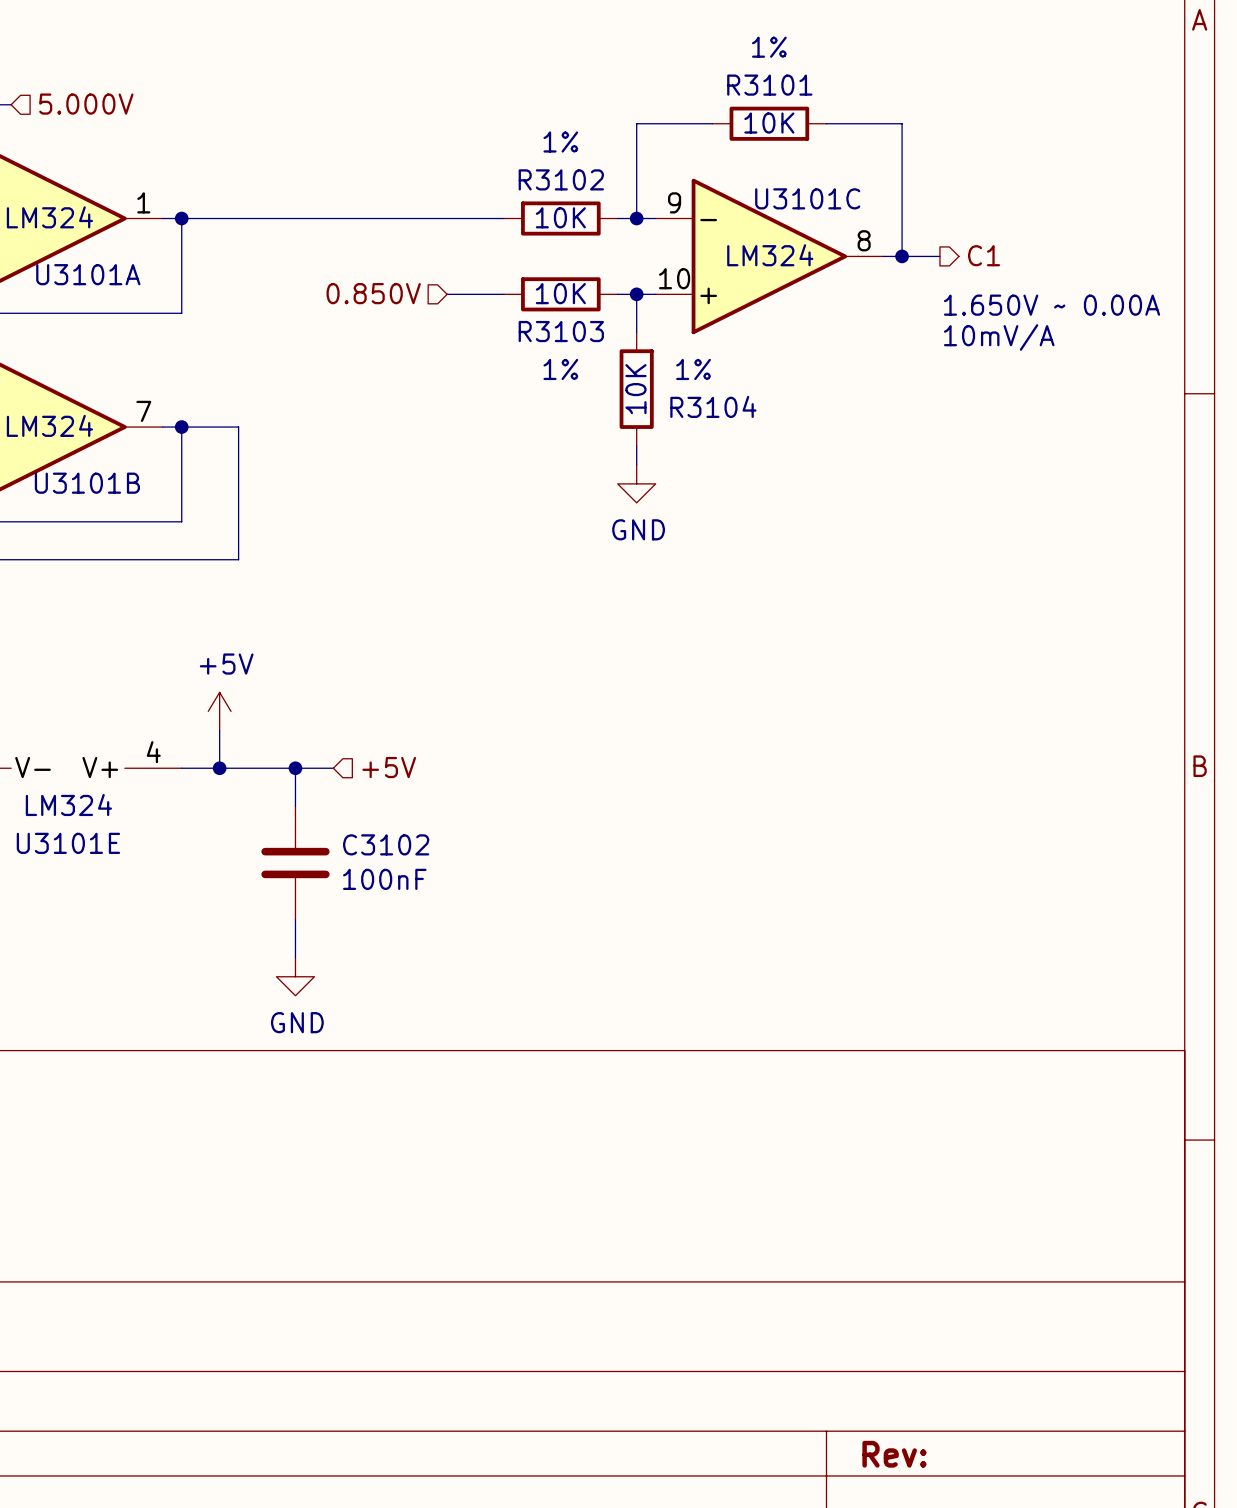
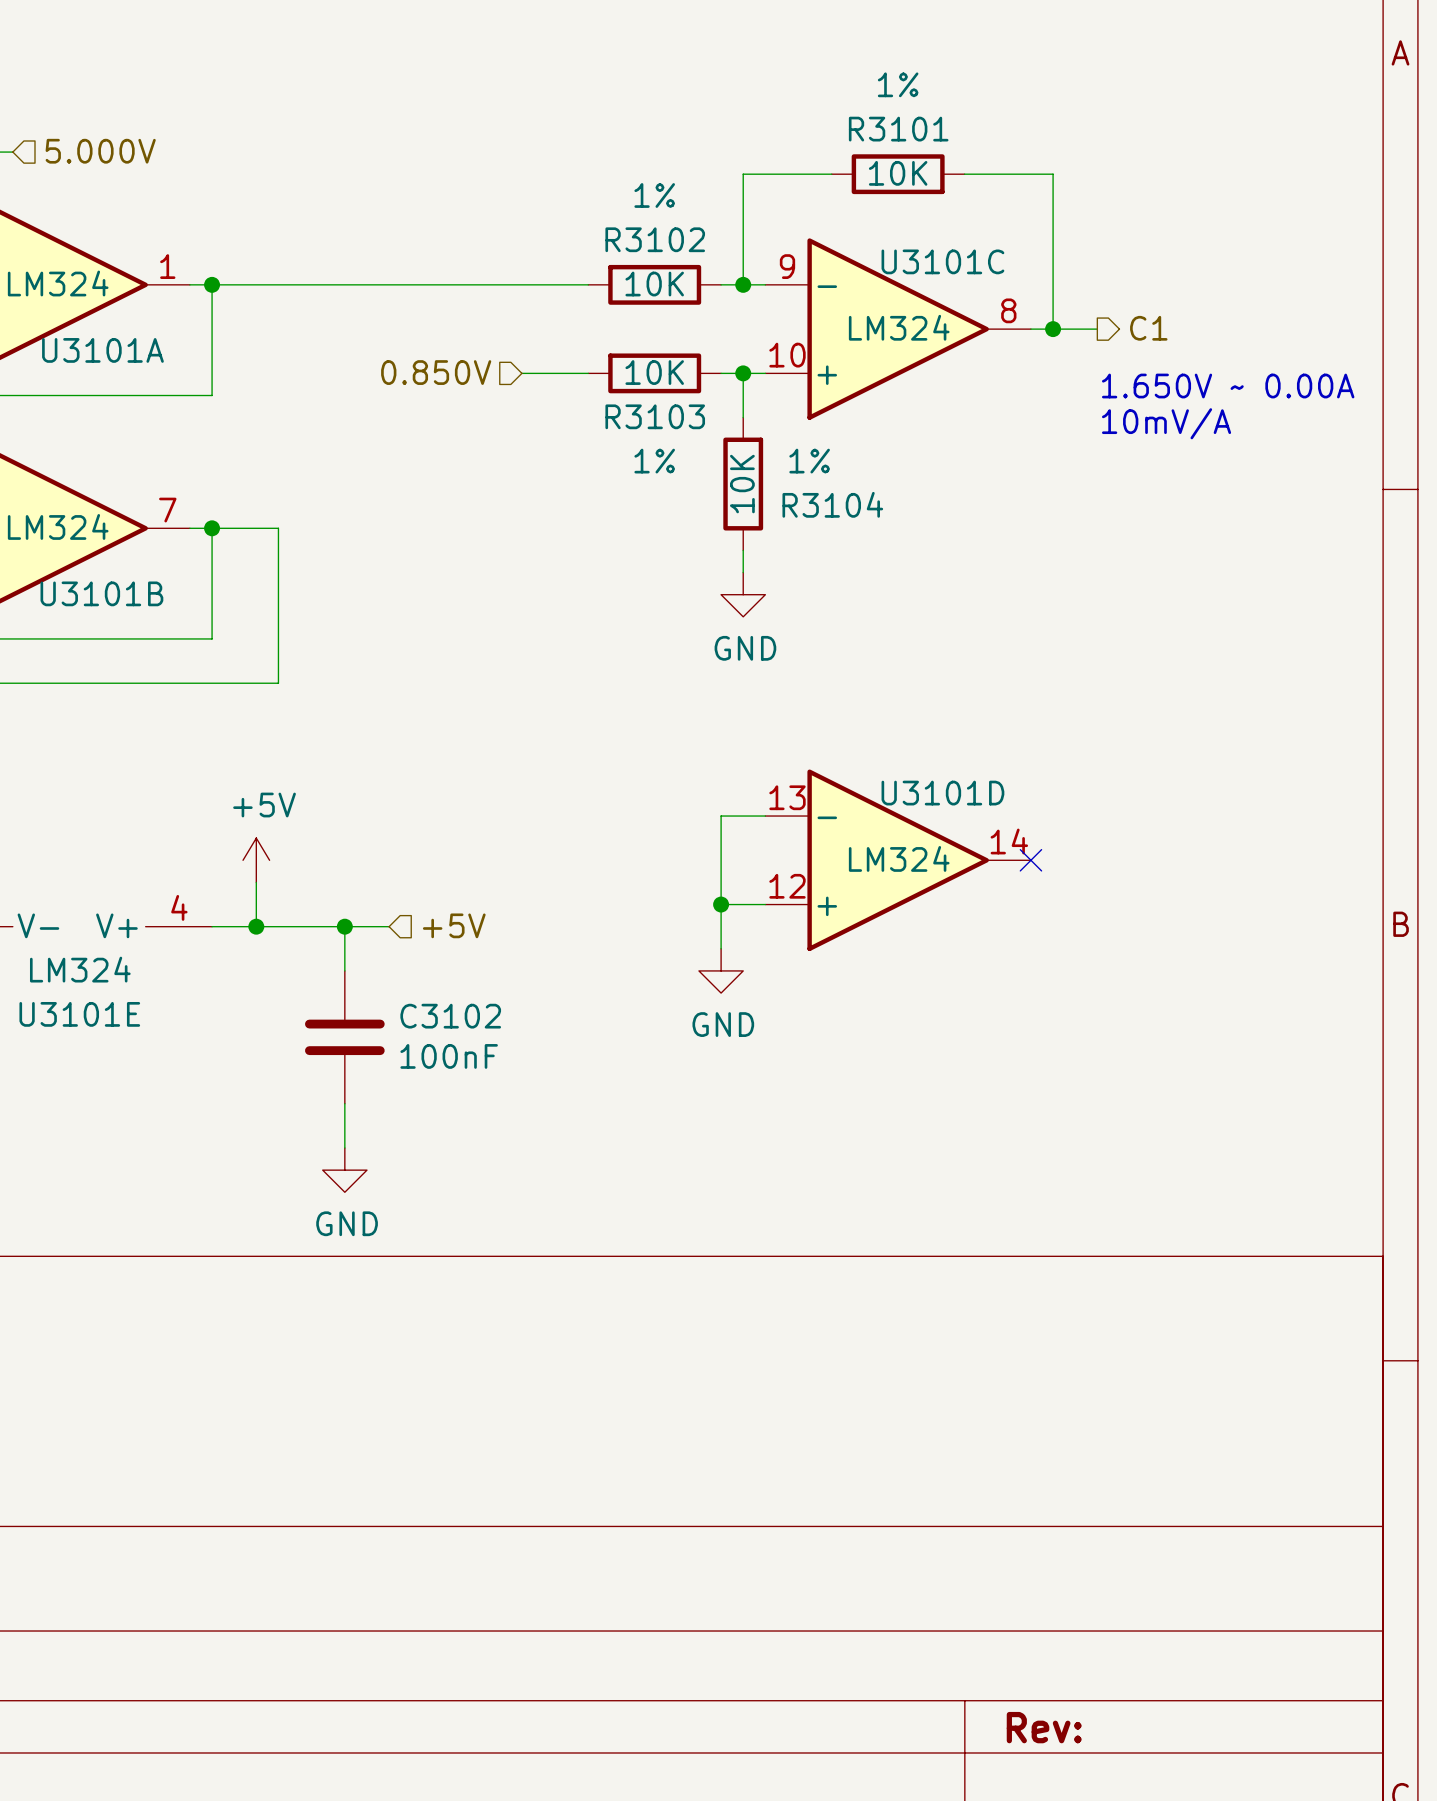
wire: none -> (765, 816) (721, 816) (721, 948)
U3101D: none -> LM324 (898, 860)
no-connect mark: none -> (1030, 860)
wire: none -> (721, 904) (765, 904)
junction: none -> (721, 904)
power symbol: none -> GND (721, 970)

